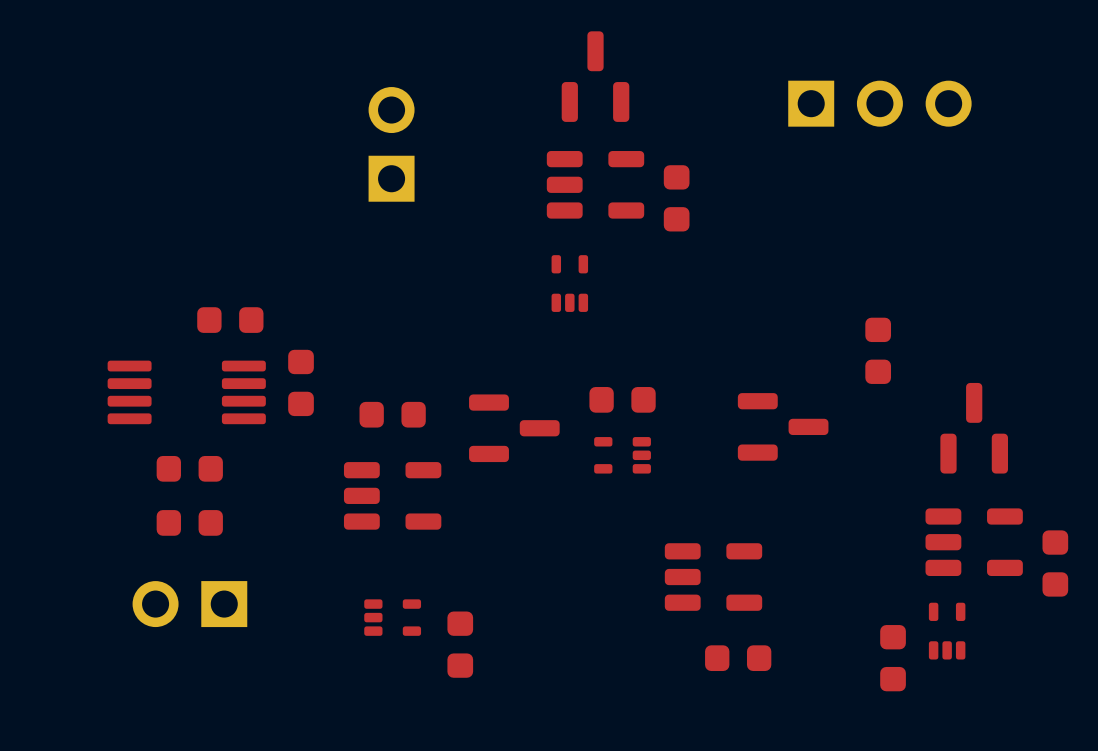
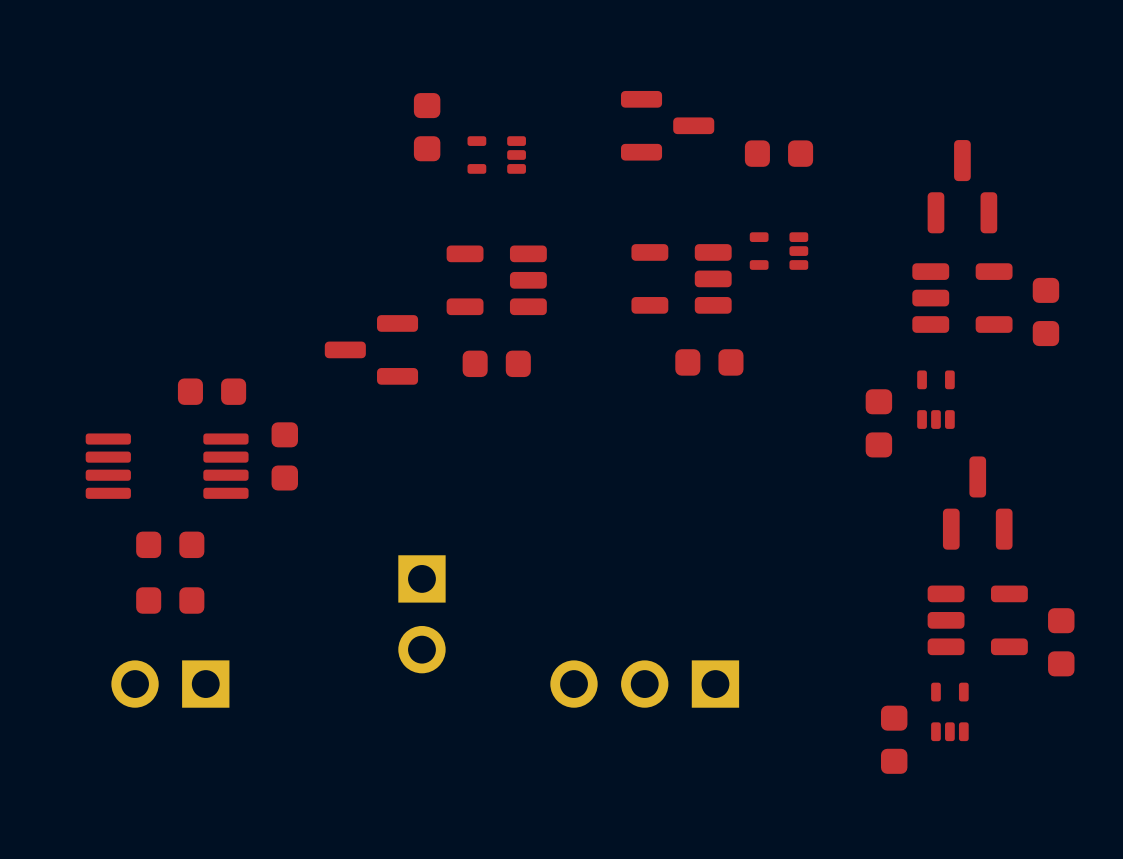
part: none -> (427, 127)
part rotation: 0° (595, 76) -> 90° clockwise (667, 125)
part position: (595, 76) -> (667, 125)
part: none -> (779, 153)
part: none -> (496, 155)
part rotation: 0° (879, 103) -> 180° (644, 684)
part position: (879, 103) -> (644, 684)
part: none -> (962, 186)
part rotation: 0° (391, 144) -> 180° (421, 614)
part position: (391, 144) -> (421, 614)
part footprint: [663, 165, 690, 232] -> [631, 244, 732, 314]
part: none -> (779, 251)
part rotation: 0° (595, 184) -> 180° (496, 280)
part position: (595, 184) -> (496, 280)
part: none -> (962, 298)
part: none -> (1045, 311)
part: none -> (371, 349)
part: (569, 283) -> none
part: none -> (709, 362)
part: none -> (496, 363)
part: none -> (935, 399)
part: (622, 399) -> none
part: (392, 414) -> none
part: (783, 426) -> none
part: (514, 428) -> none
part: (622, 455) -> none
part: (392, 495) -> none
part: (713, 577) -> none
part: (392, 617) -> none
part: (460, 644) -> none
part: (738, 658) -> none

